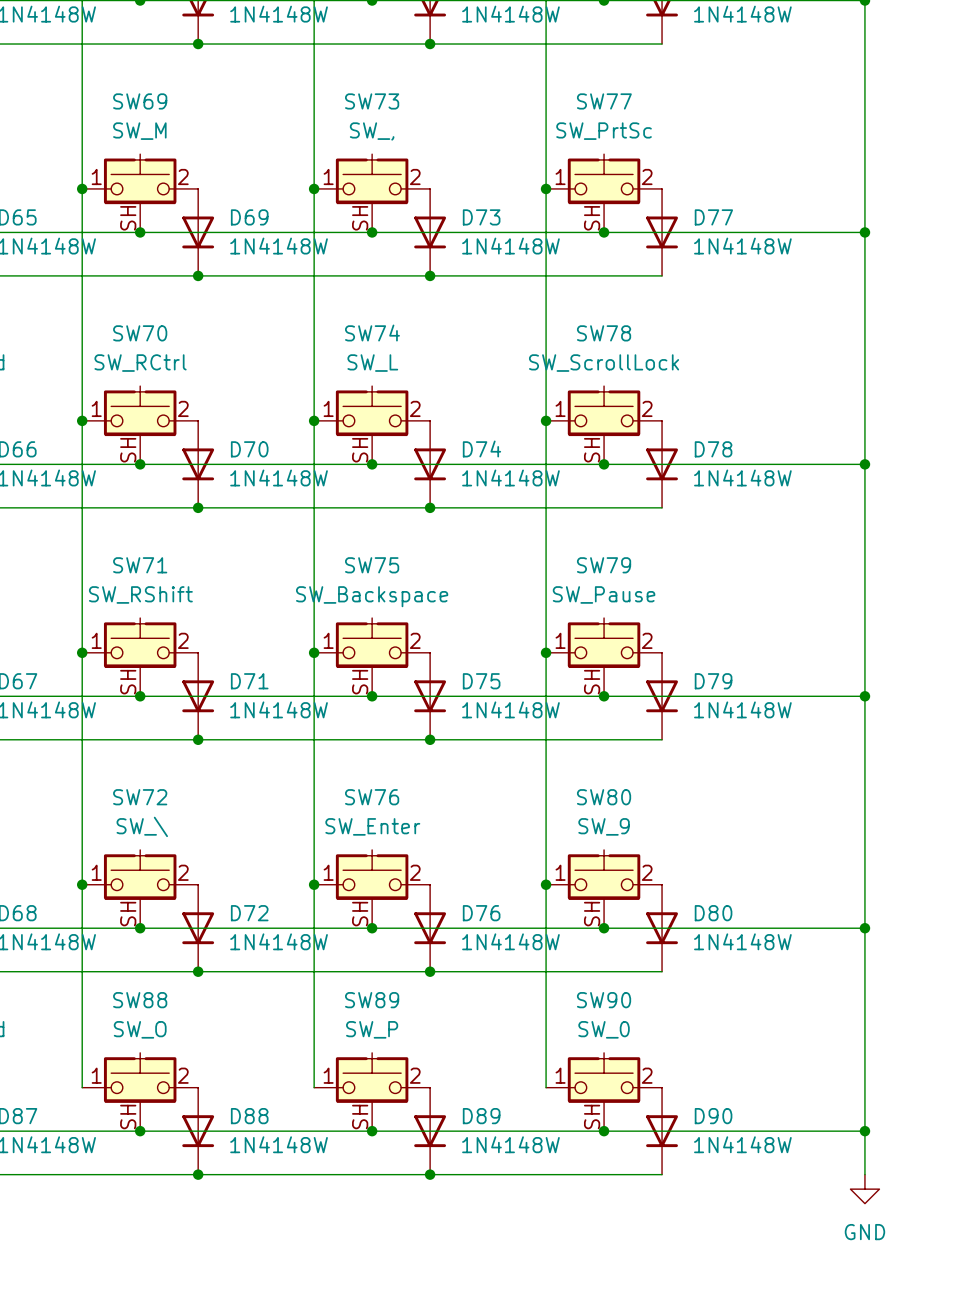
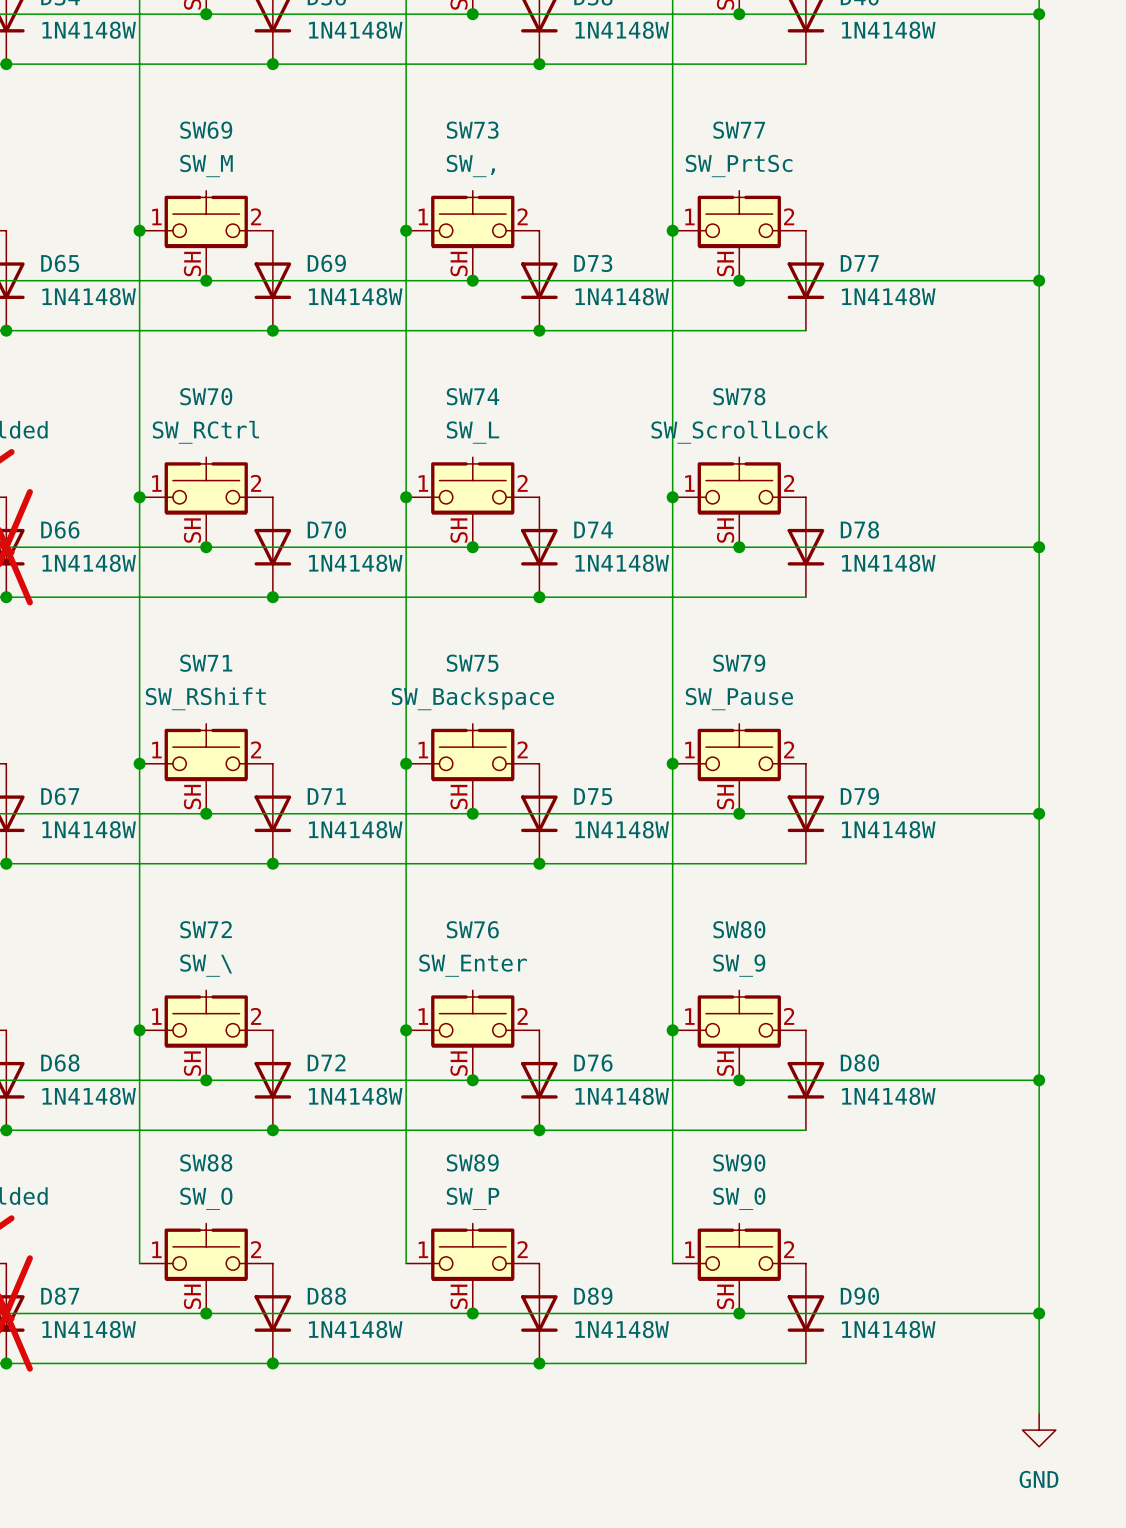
wire: none -> (1039, 1363) (1039, 1413)
power symbol position: GND (864, 1189) -> GND (1039, 1430)

